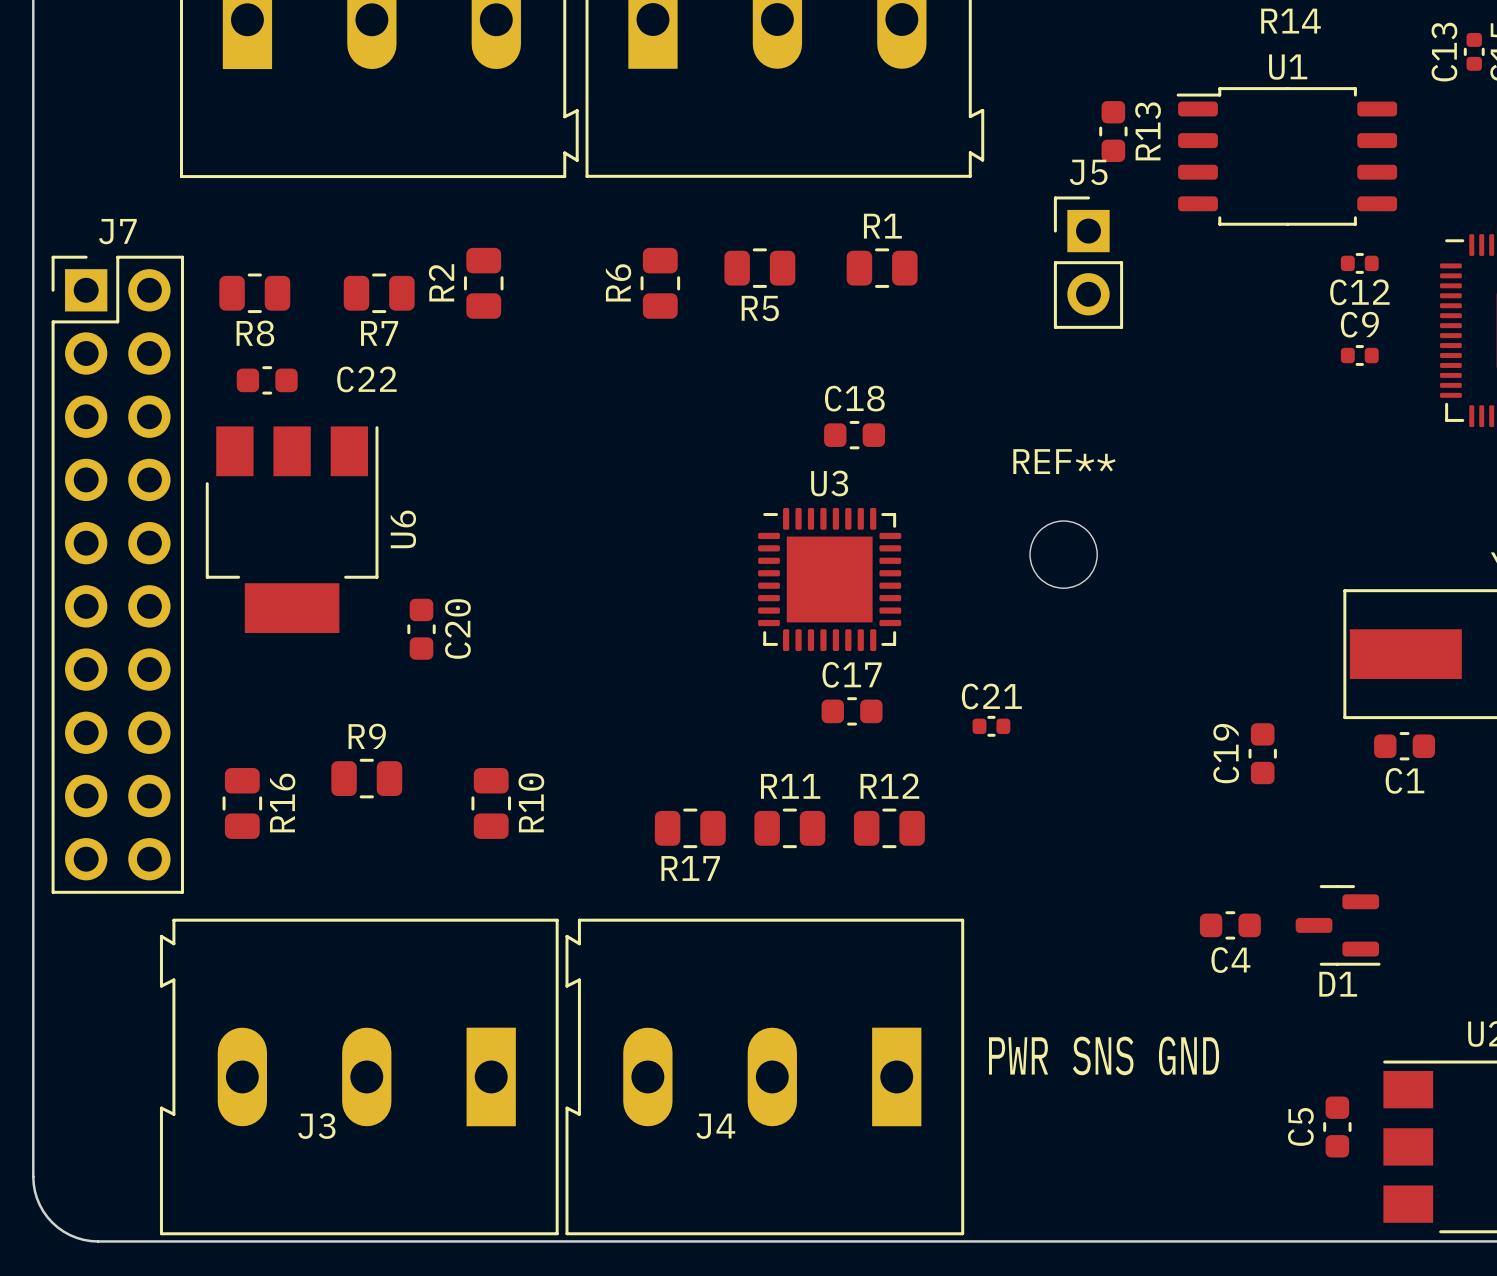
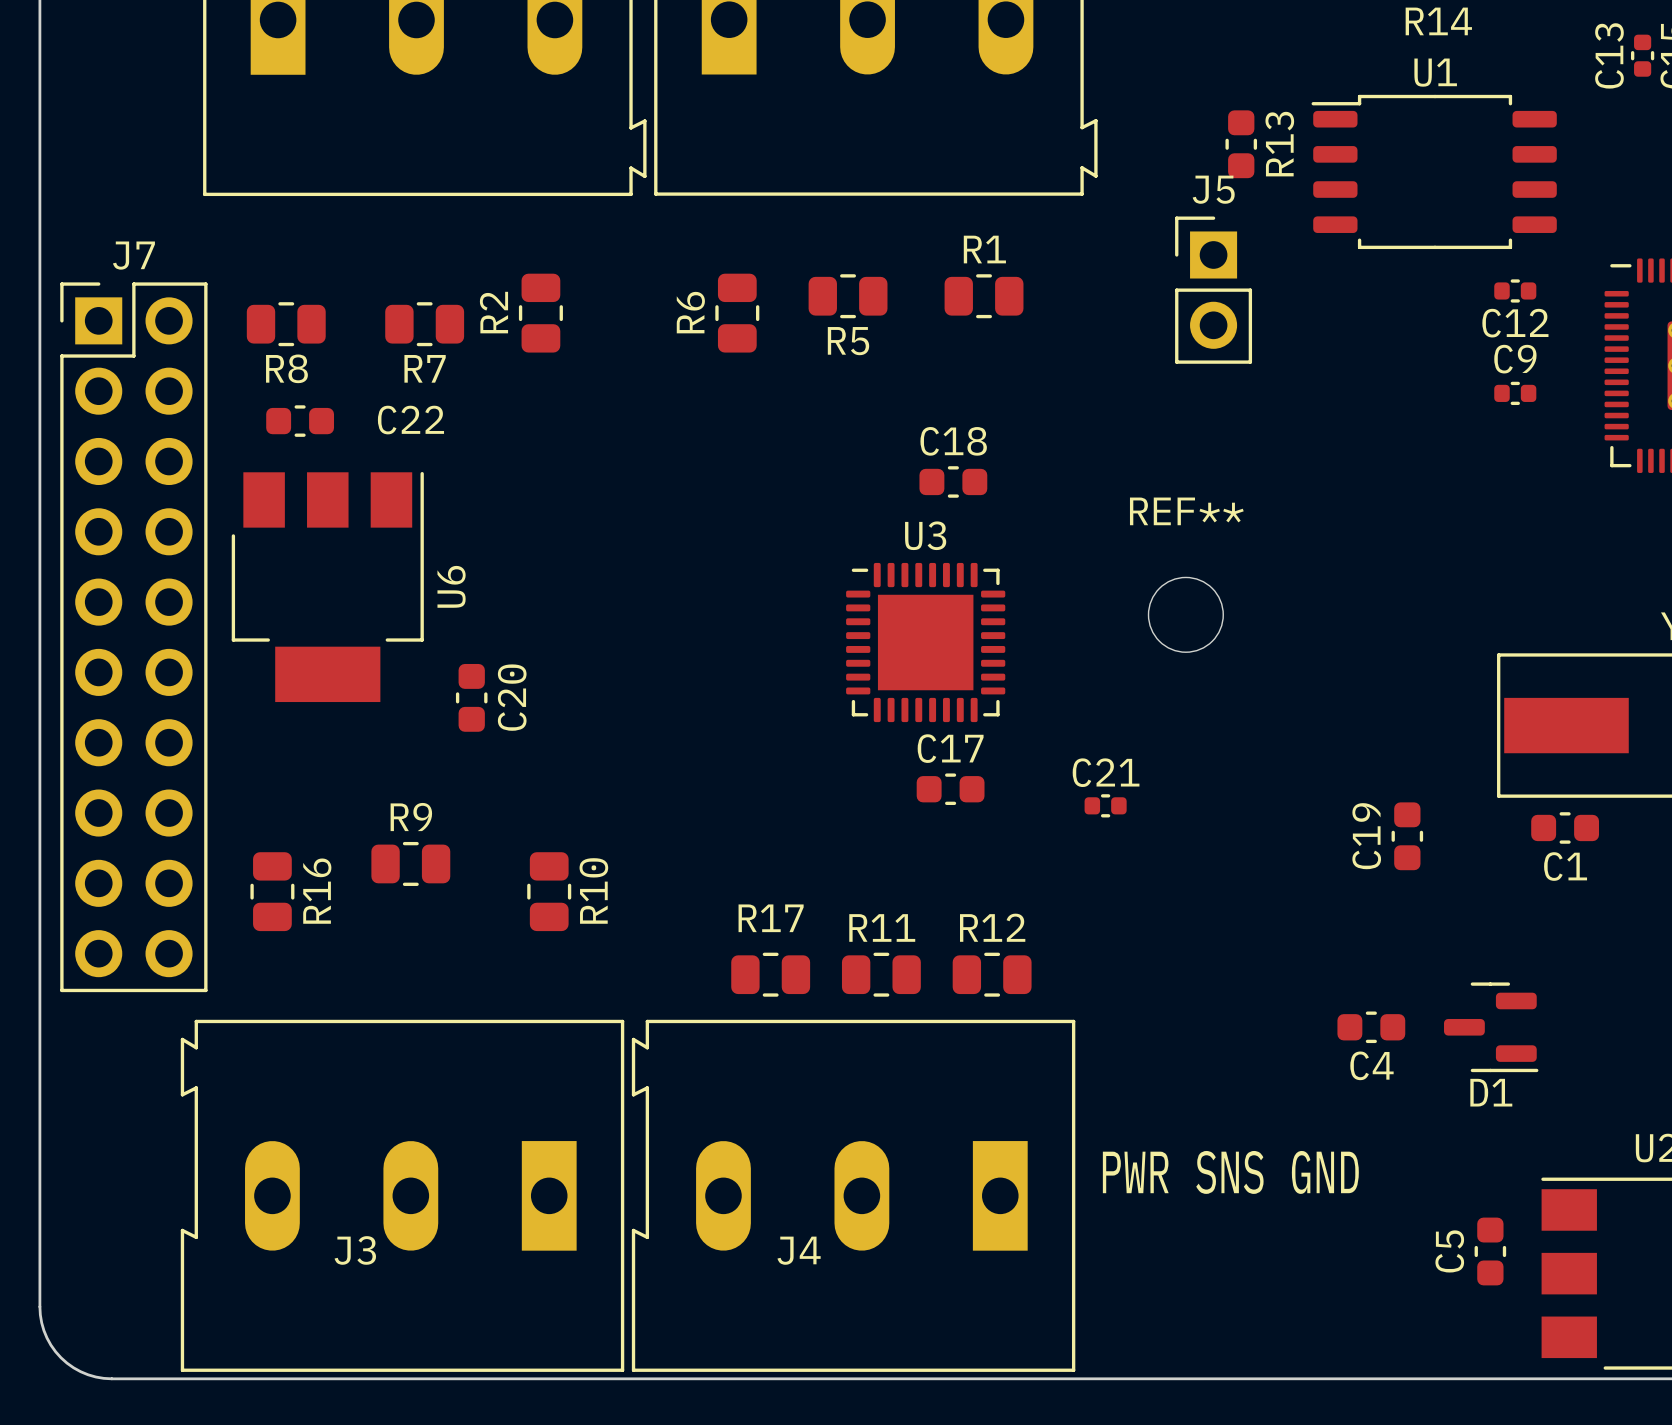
R17 position: (690, 828) -> (770, 974)
R11 position: (789, 828) -> (881, 974)
R12 position: (889, 828) -> (992, 974)
R17 name position: R17 (690, 868) -> R17 (771, 918)

